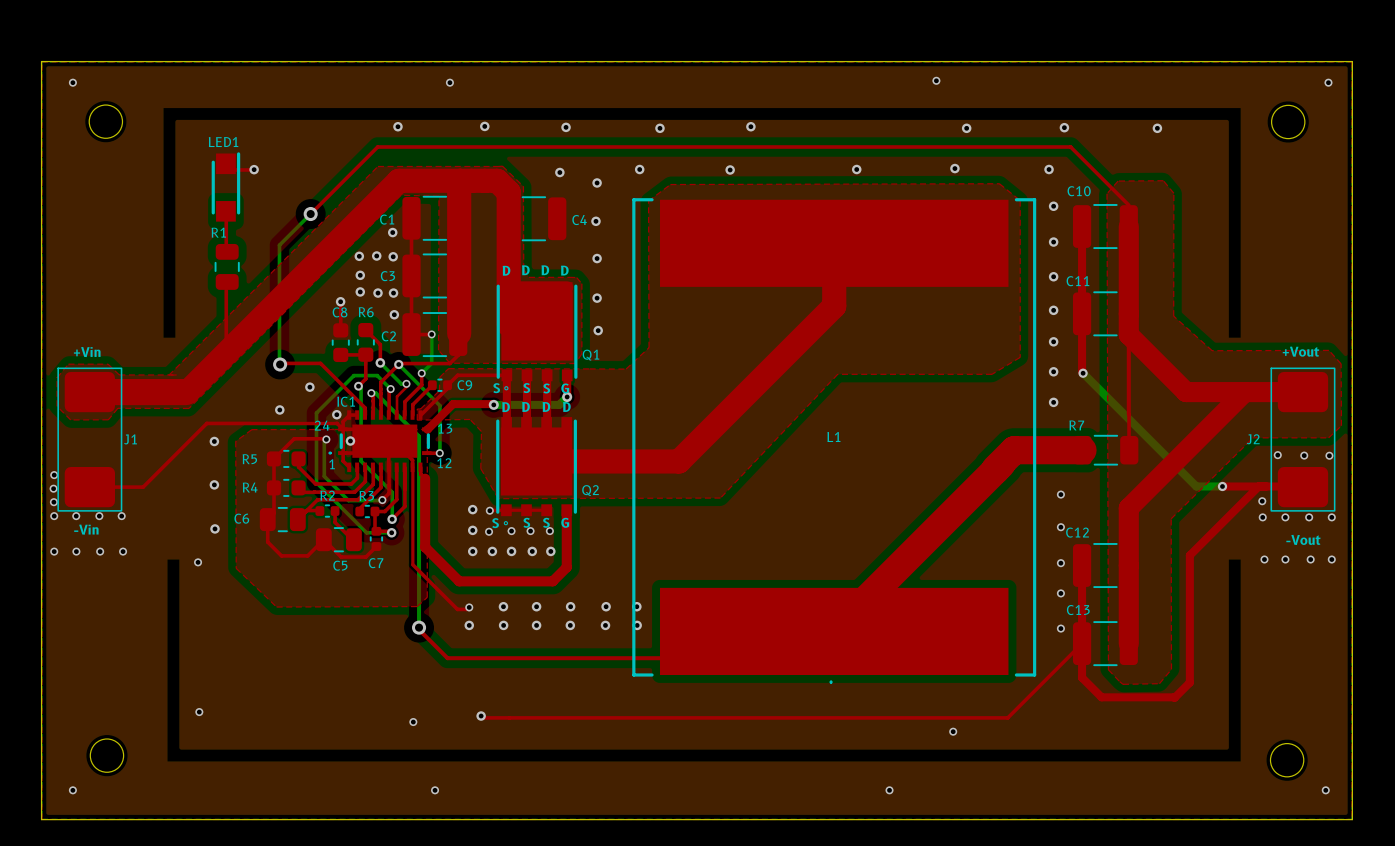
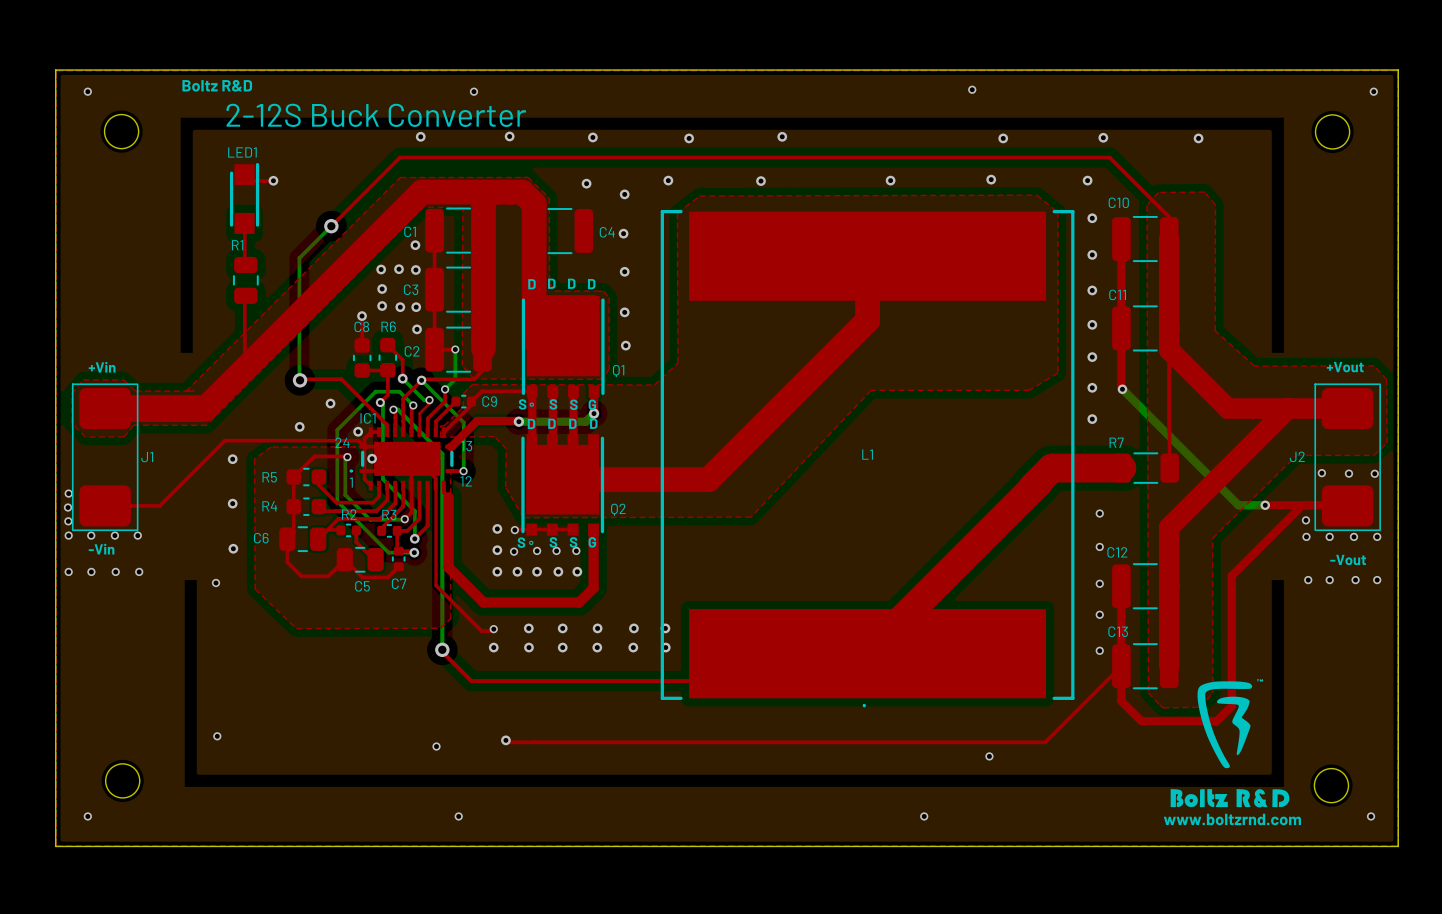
text: none -> Boltz R&D (217, 85)
text: none -> 2-12S Buck Converter (376, 115)
drawing: none -> [1170, 679, 1290, 808]
text: none -> www.boltzrnd.com (1232, 819)

